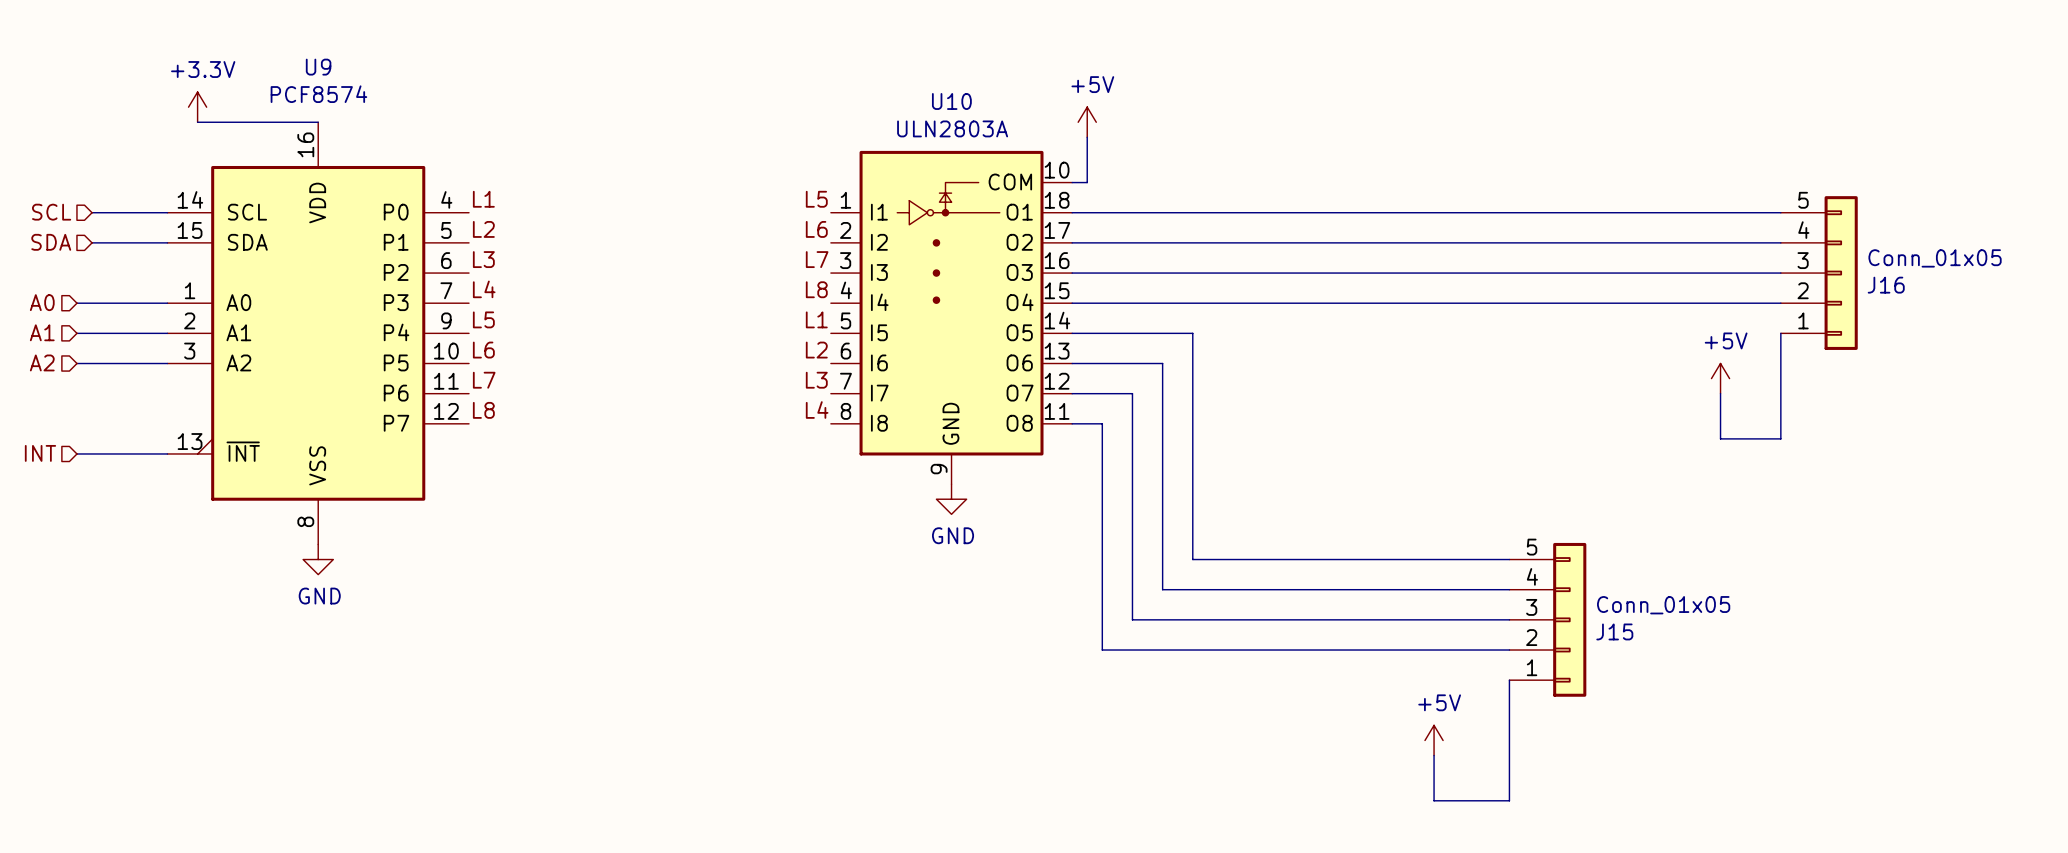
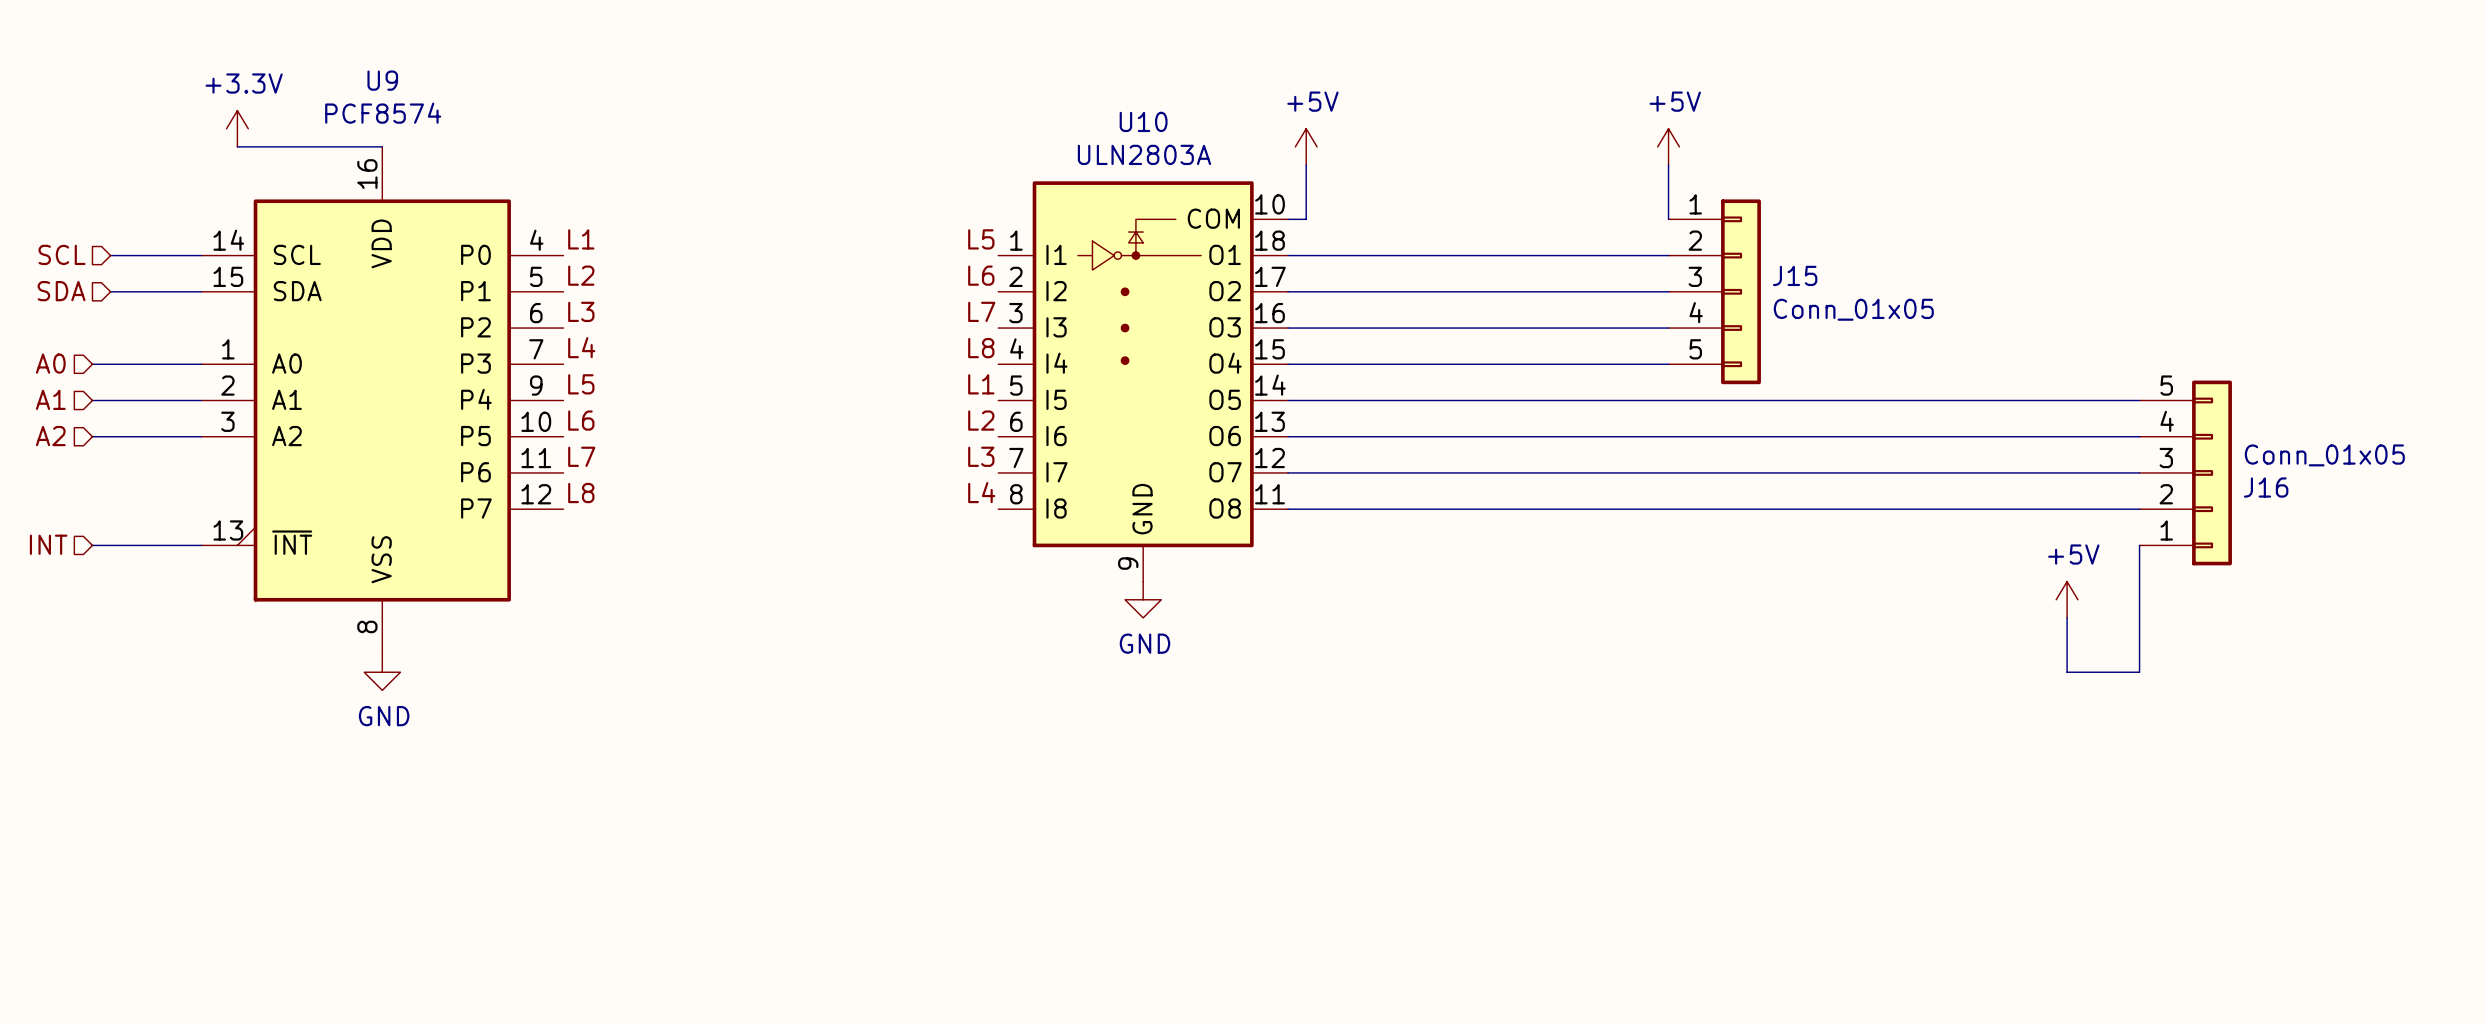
power symbol: none -> +5V (1668, 146)
wire: none -> (1668, 164) (1668, 219)
wire: (1388, 212) (1780, 212) -> none
wire: (1388, 242) (1780, 242) -> none
wire: (1388, 273) (1780, 273) -> none
J16 position: (1819, 273) -> (2185, 472)
wire: (1388, 303) (1780, 303) -> none
wire: (1192, 333) (1192, 559) (1509, 559) -> (1433, 400) (2139, 400)
wire: (1780, 333) (1780, 438) (1720, 438) (1720, 393) -> (2139, 545) (2139, 672) (2067, 672) (2067, 617)
wire: (1162, 363) (1162, 589) (1509, 589) -> (1396, 436) (2139, 436)
power symbol position: +5V (1720, 378) -> +5V (2067, 599)
wire: (1132, 393) (1132, 619) (1509, 619) -> (1360, 472) (2139, 472)
wire: (1102, 423) (1102, 650) (1509, 650) -> (1324, 509) (2139, 509)
J15 position: (1547, 619) -> (1714, 291)
J15 flip: as is (1569, 619) -> up-down (1741, 291)
wire: (1509, 680) (1509, 800) (1434, 800) (1434, 755) -> none
power symbol: +5V (1434, 740) -> none

